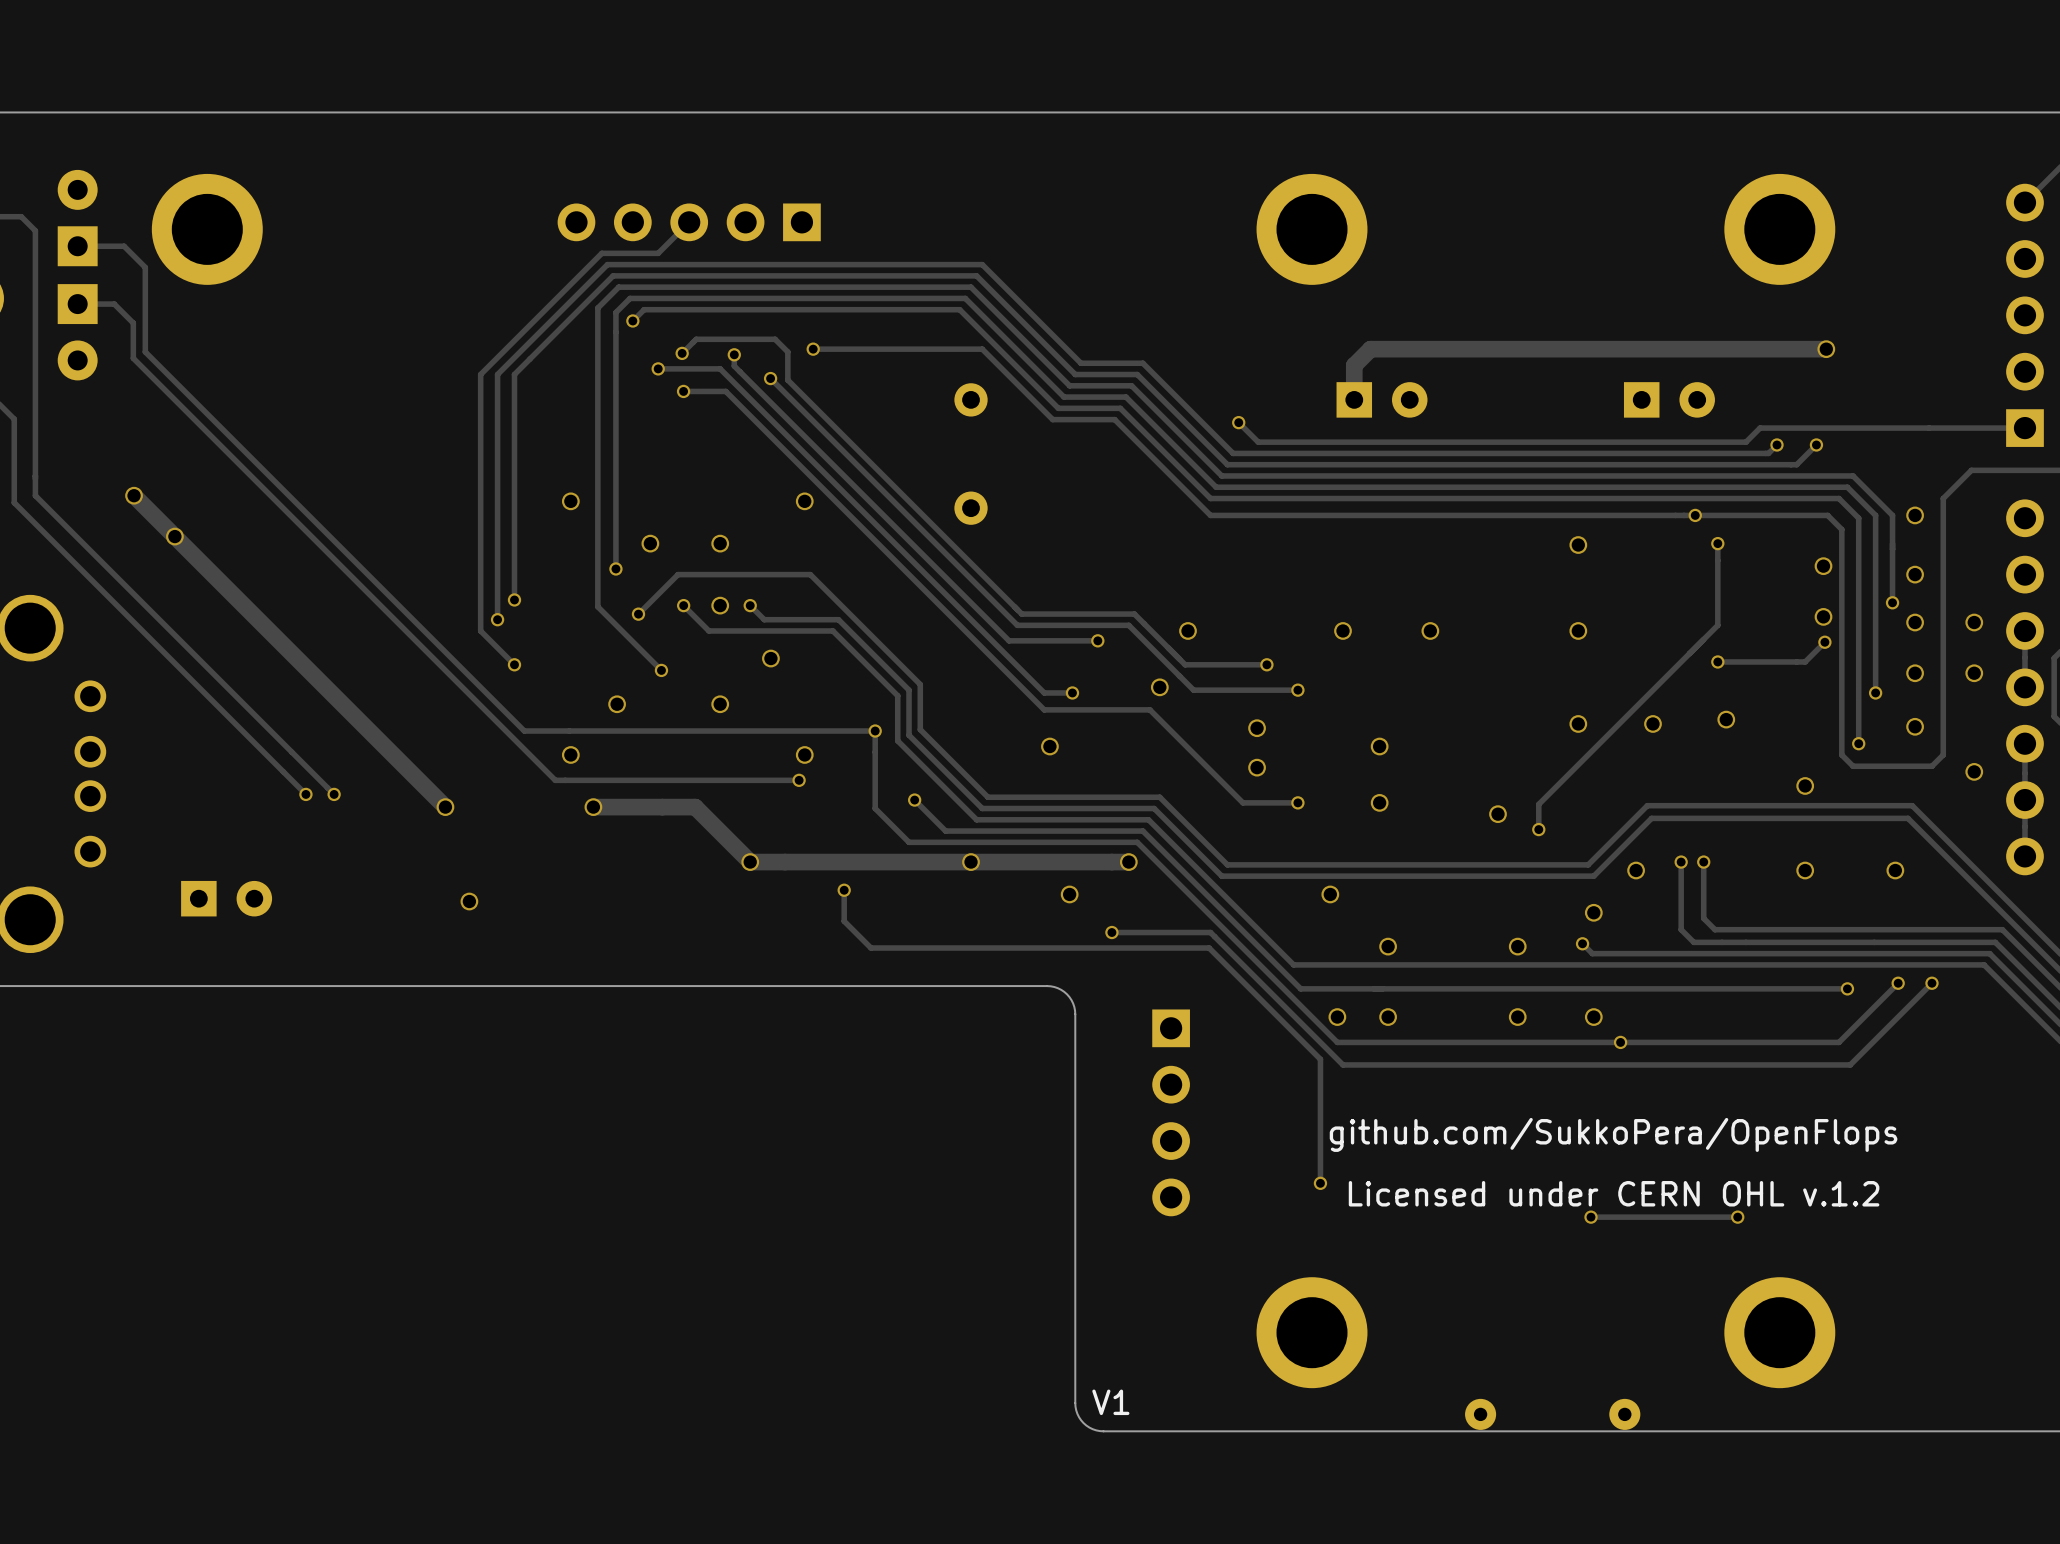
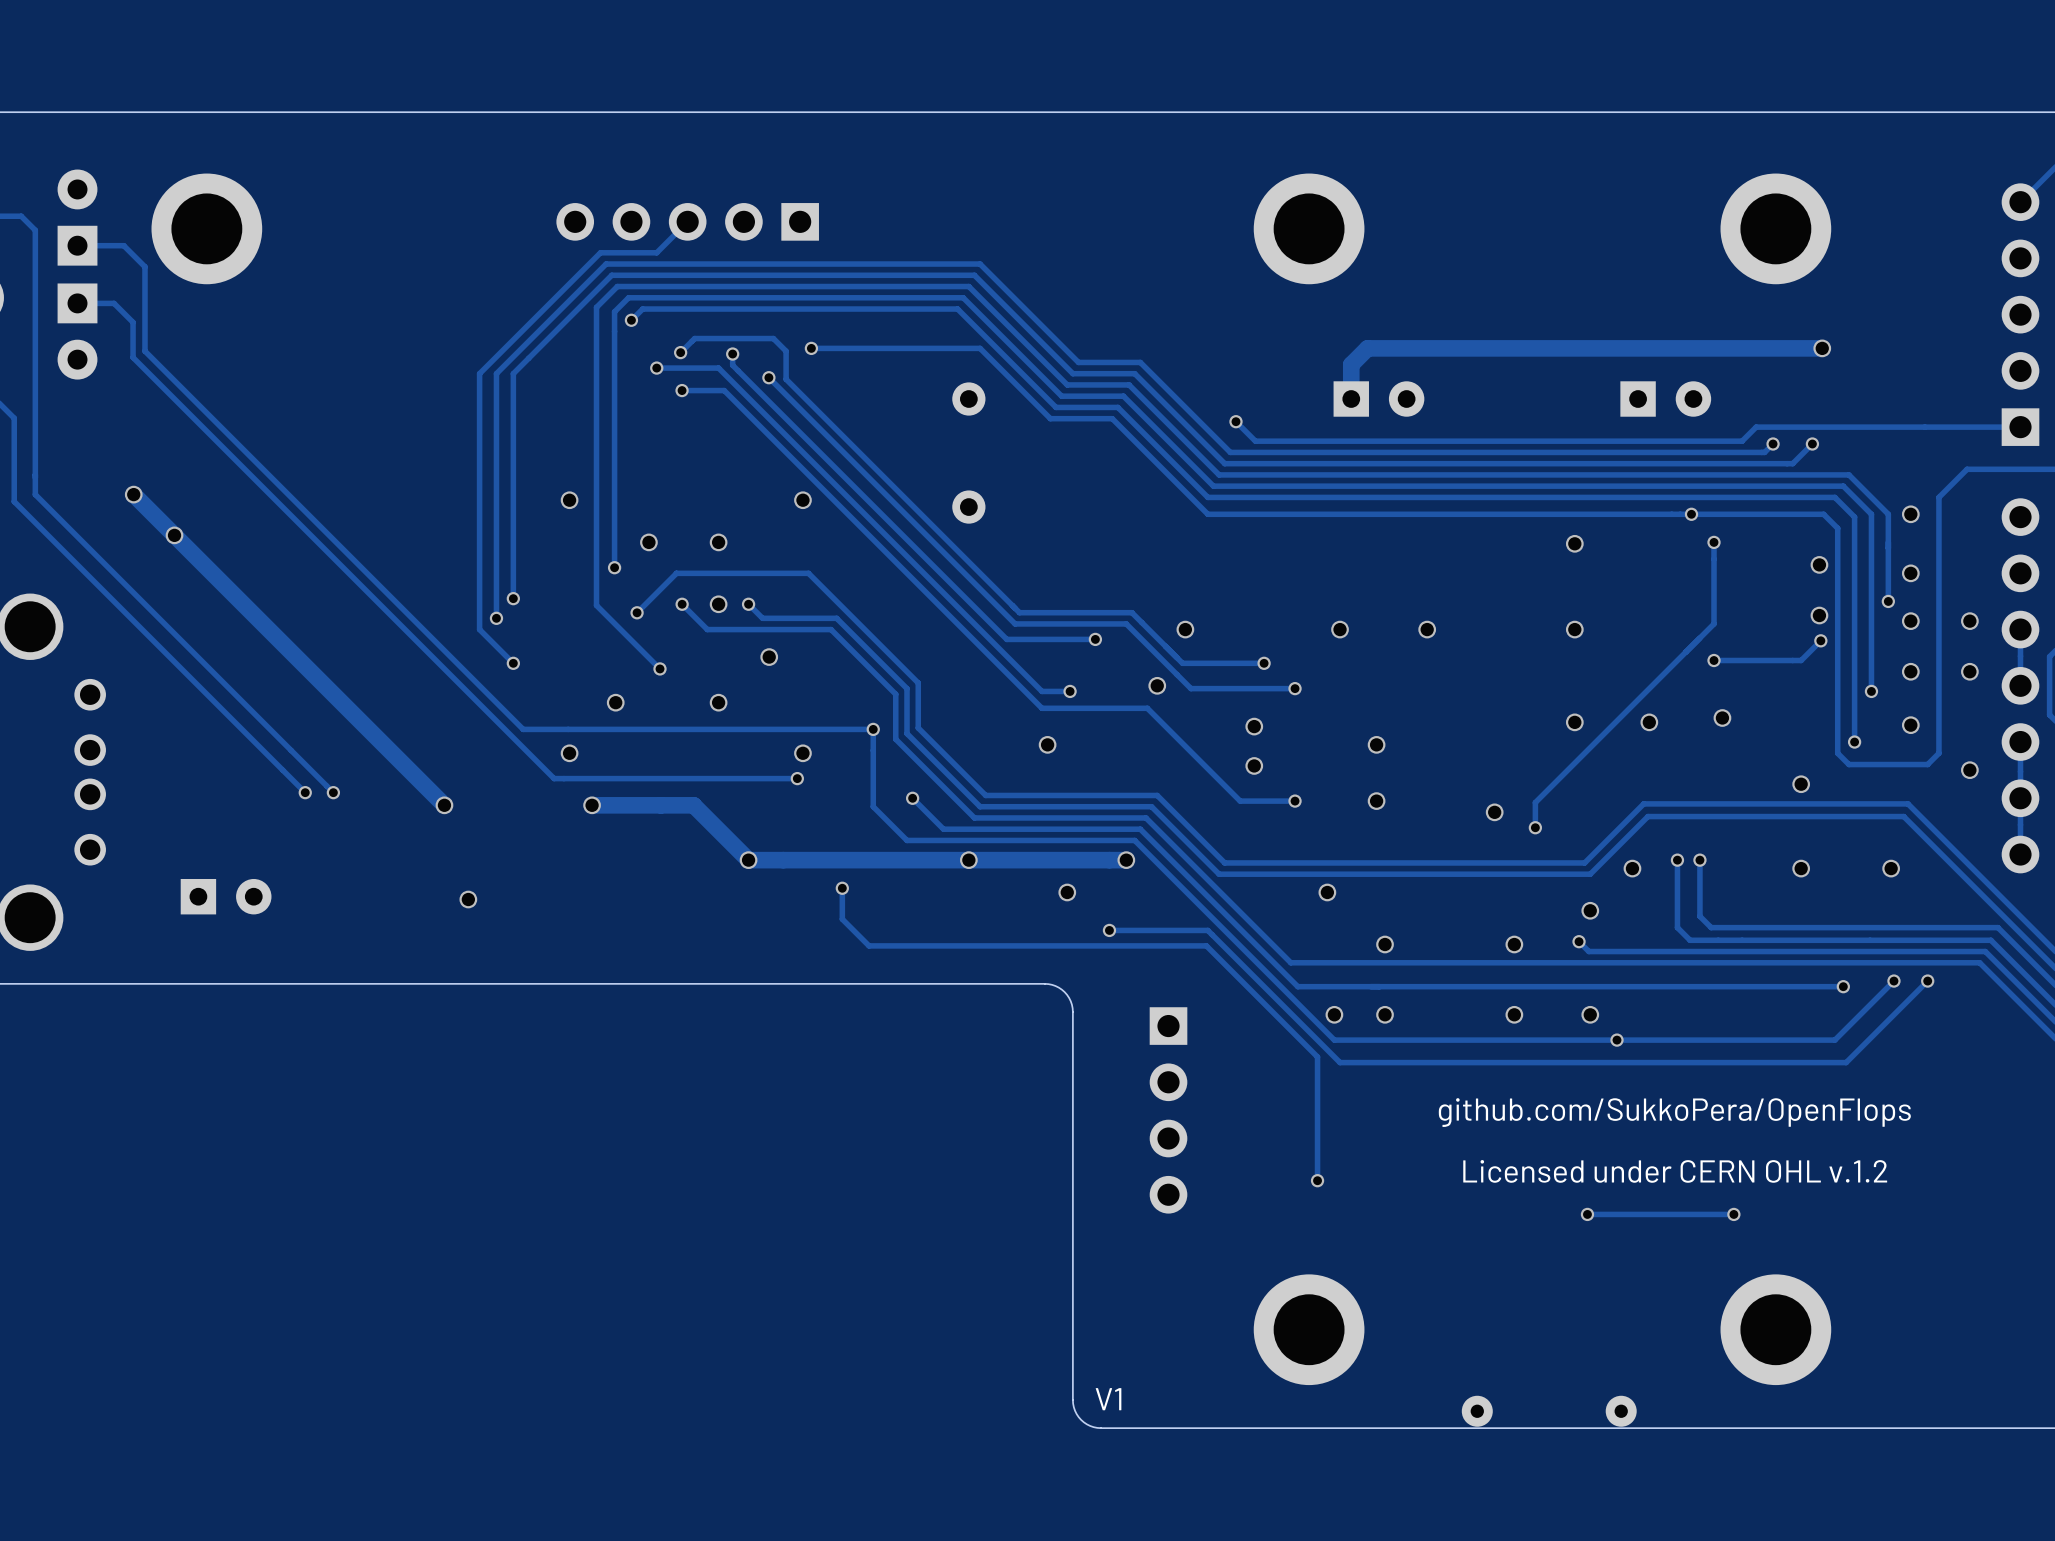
text position: github.com/SukkoPera/OpenFlops (1613, 1134) -> github.com/SukkoPera/OpenFlops (1674, 1112)
text position: Licensed under CERN OHL v.1.2 (1614, 1193) -> Licensed under CERN OHL v.1.2 (1675, 1171)

